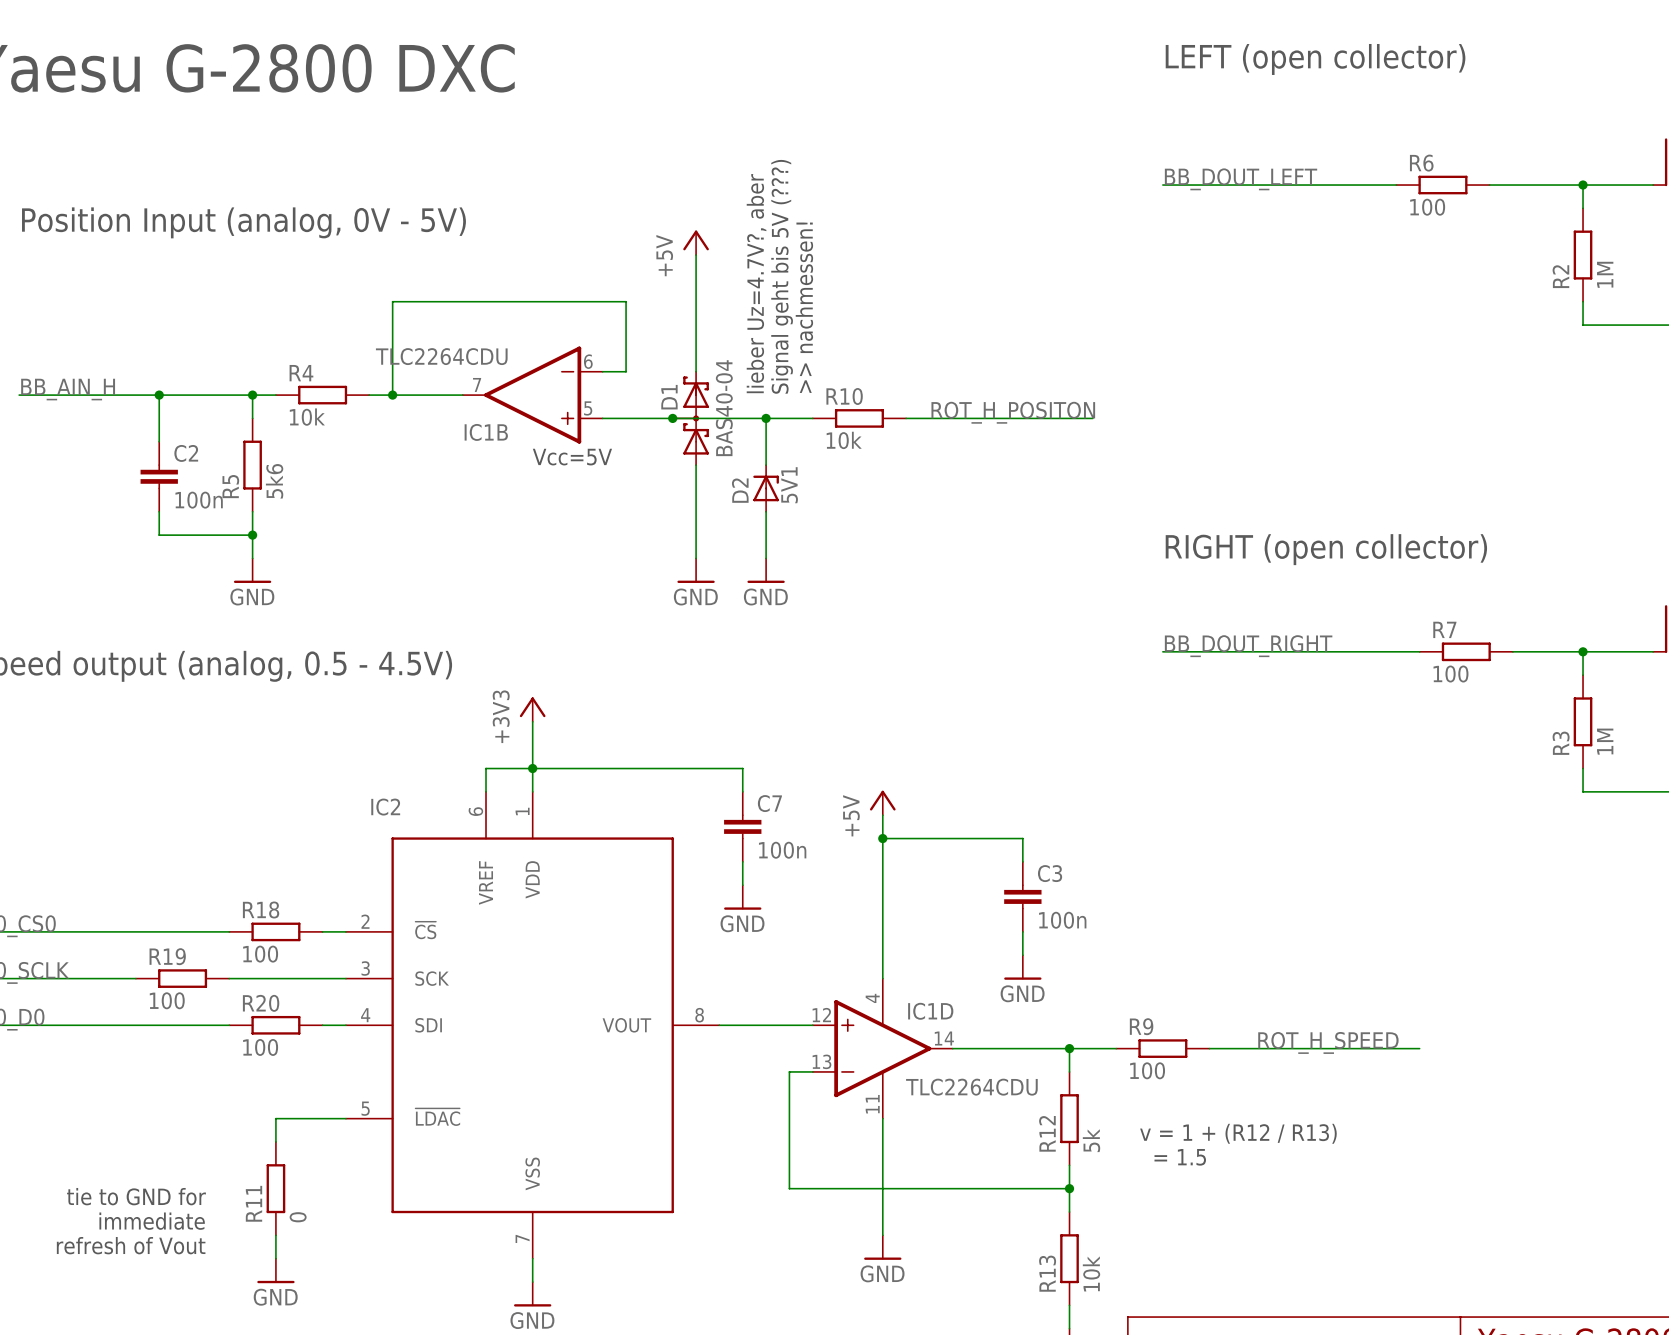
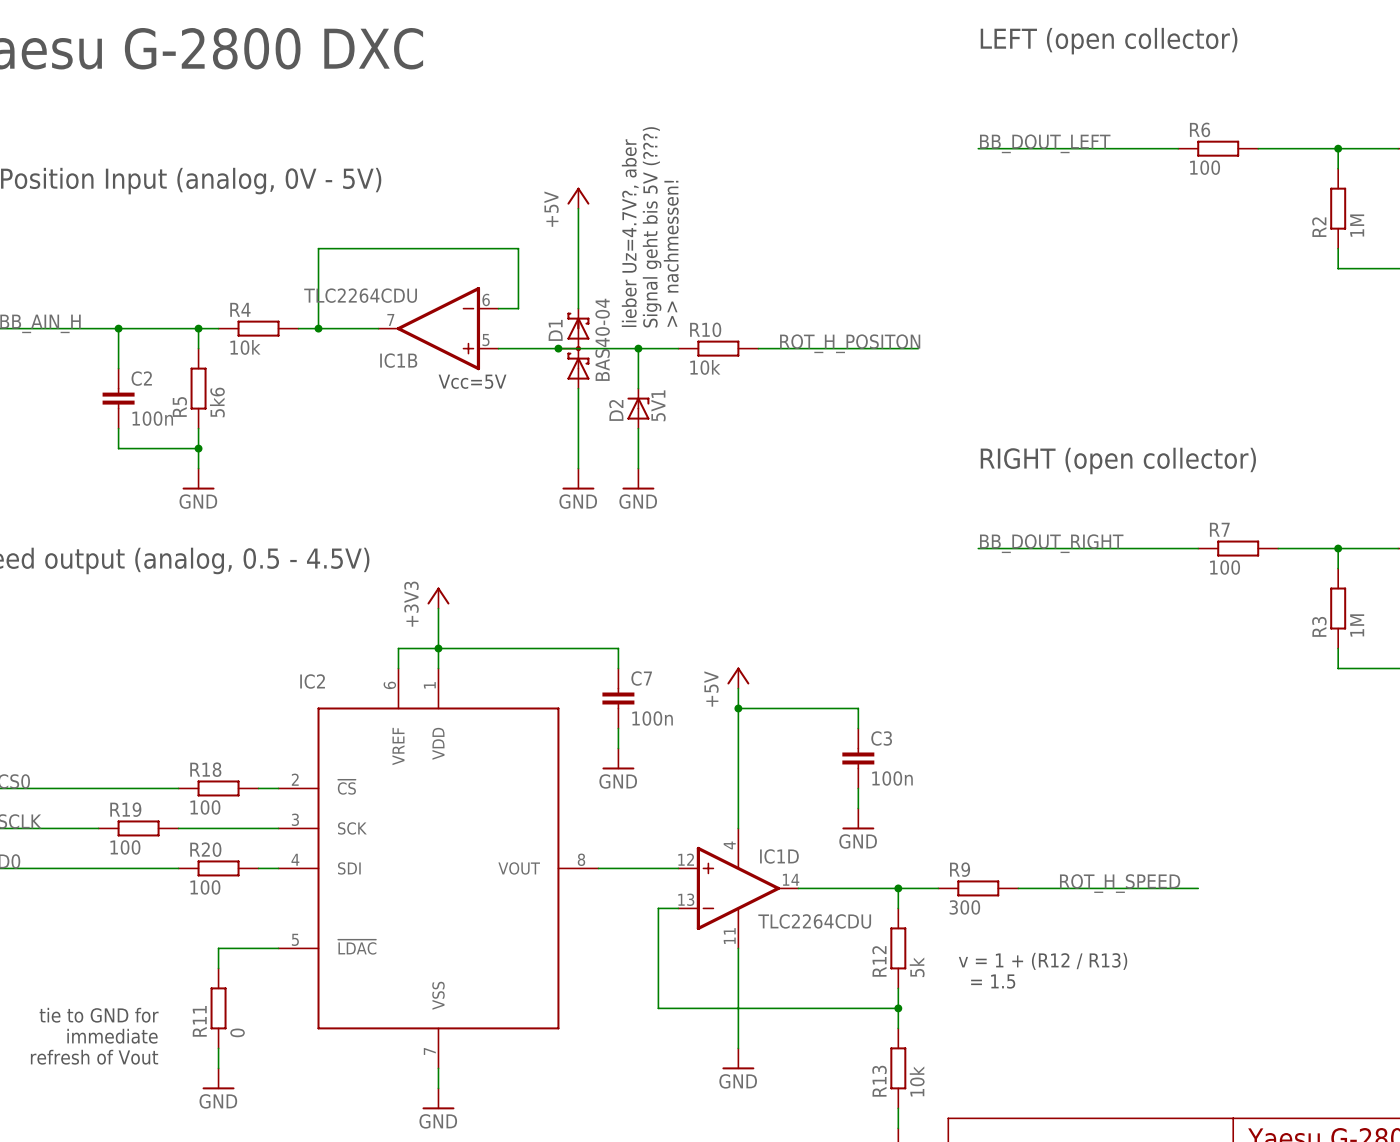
R9 value: 100 (1147, 1070) -> 300 (964, 907)

